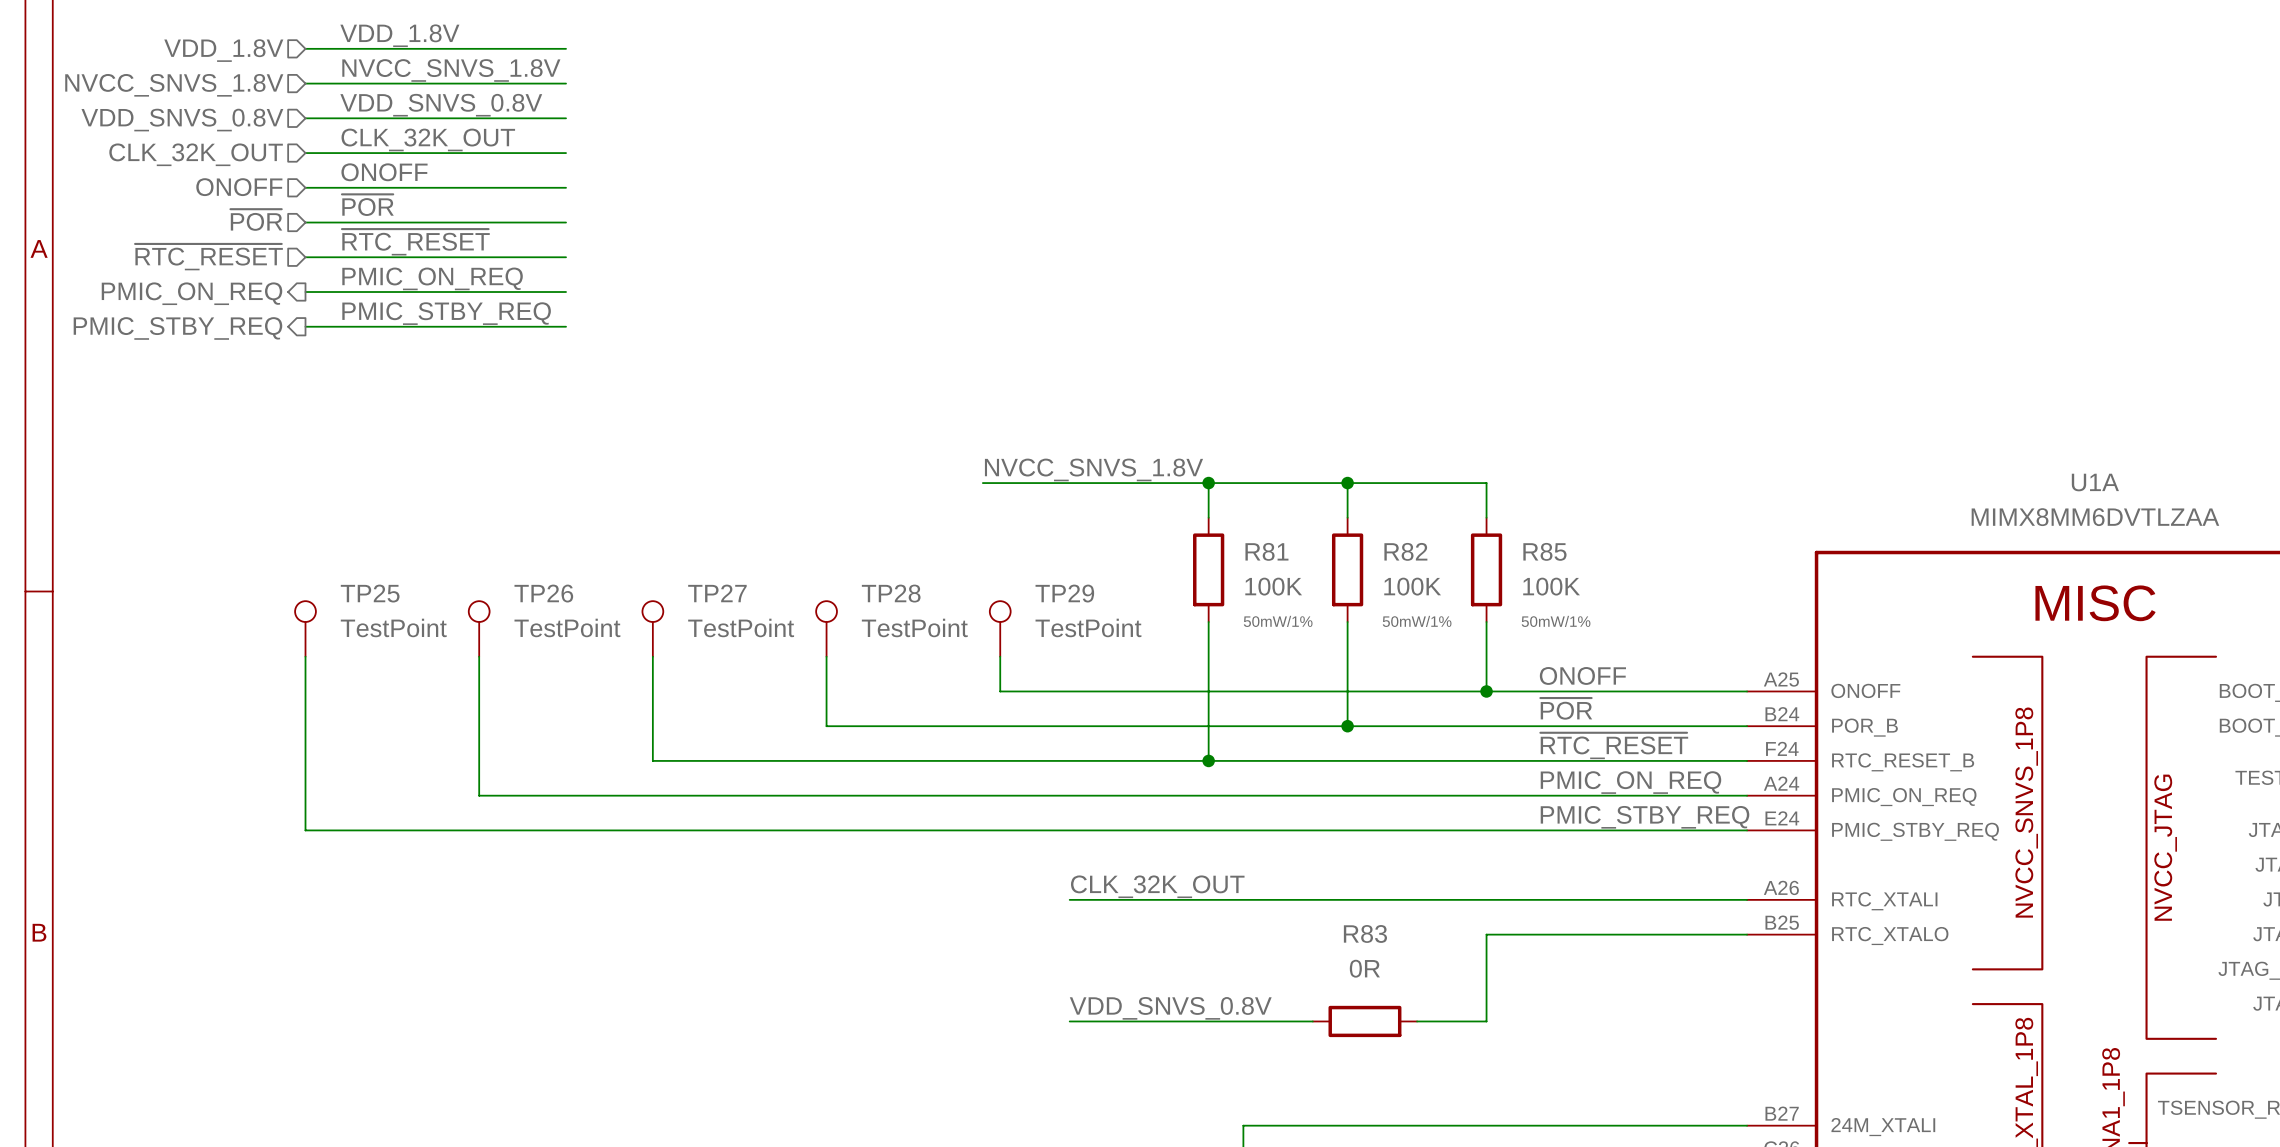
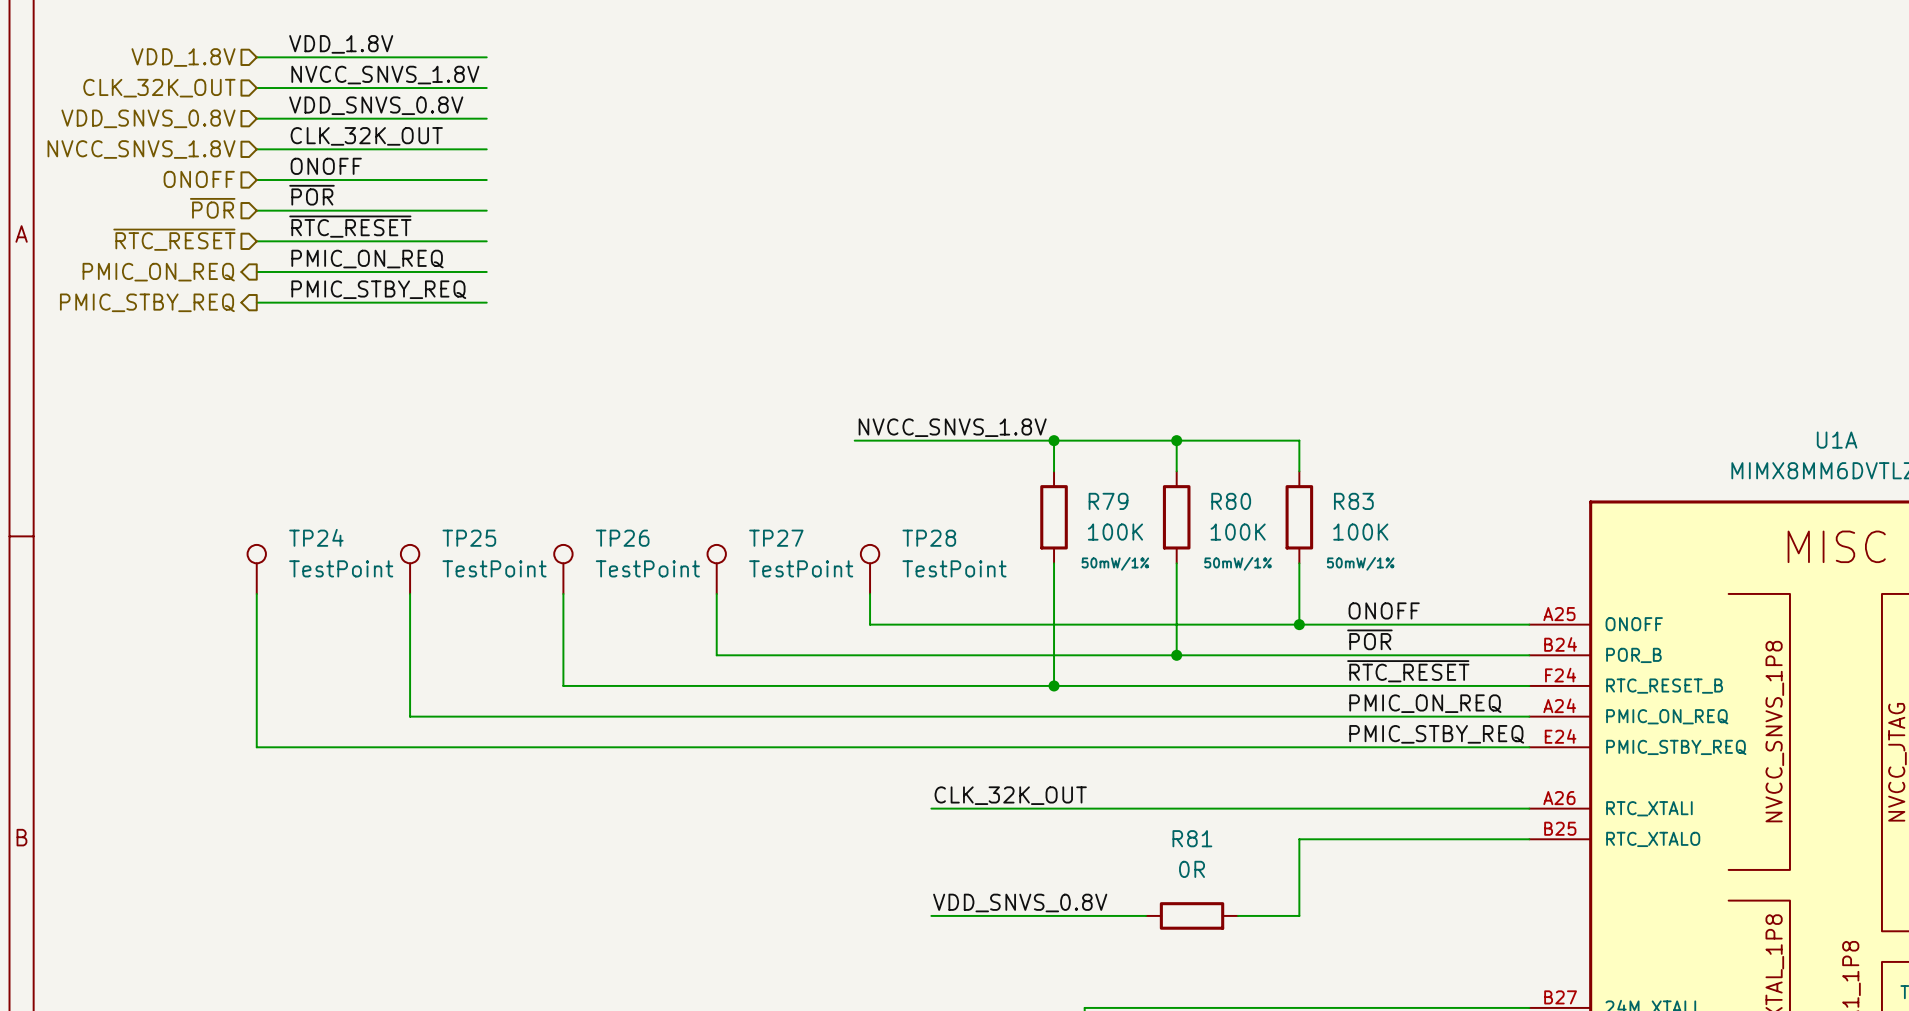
hierarchical label: NVCC_SNVS_1.8V (174, 85) -> CLK_32K_OUT (159, 88)
hierarchical label: CLK_32K_OUT (196, 154) -> NVCC_SNVS_1.8V (141, 149)
R81 name: R81 (1266, 551) -> R79 (1108, 501)
R82 name: R82 (1405, 551) -> R80 (1231, 501)
R85 name: R85 (1544, 551) -> R83 (1353, 501)
TP25 name: TP25 (370, 593) -> TP24 (316, 537)
TP26 name: TP26 (543, 593) -> TP25 (469, 538)
TP27 name: TP27 (717, 593) -> TP26 (622, 538)
TP28 name: TP28 (891, 593) -> TP27 (776, 538)
TP29 name: TP29 (1064, 593) -> TP28 (929, 538)
R83 name: R83 (1365, 933) -> R81 (1192, 838)

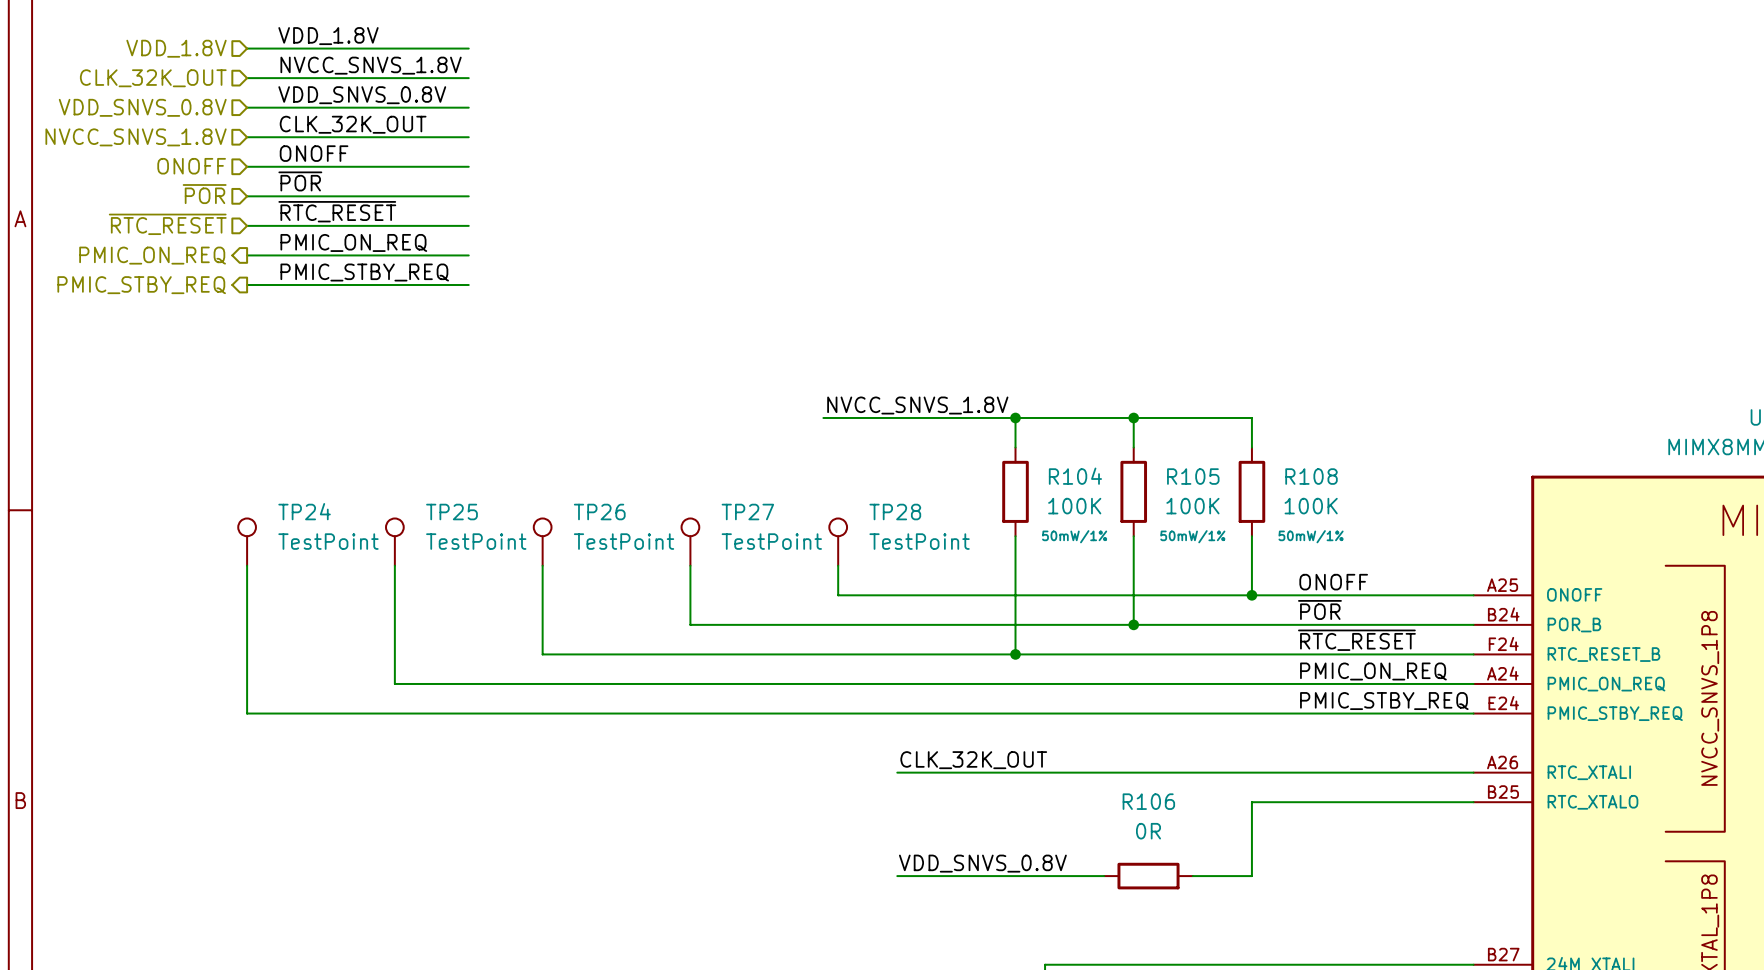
R79 name: R79 (1108, 501) -> R104 (1075, 476)
R80 name: R80 (1231, 501) -> R105 (1193, 476)
R83 name: R83 (1353, 501) -> R108 (1311, 476)
R81 name: R81 (1192, 838) -> R106 (1148, 801)

